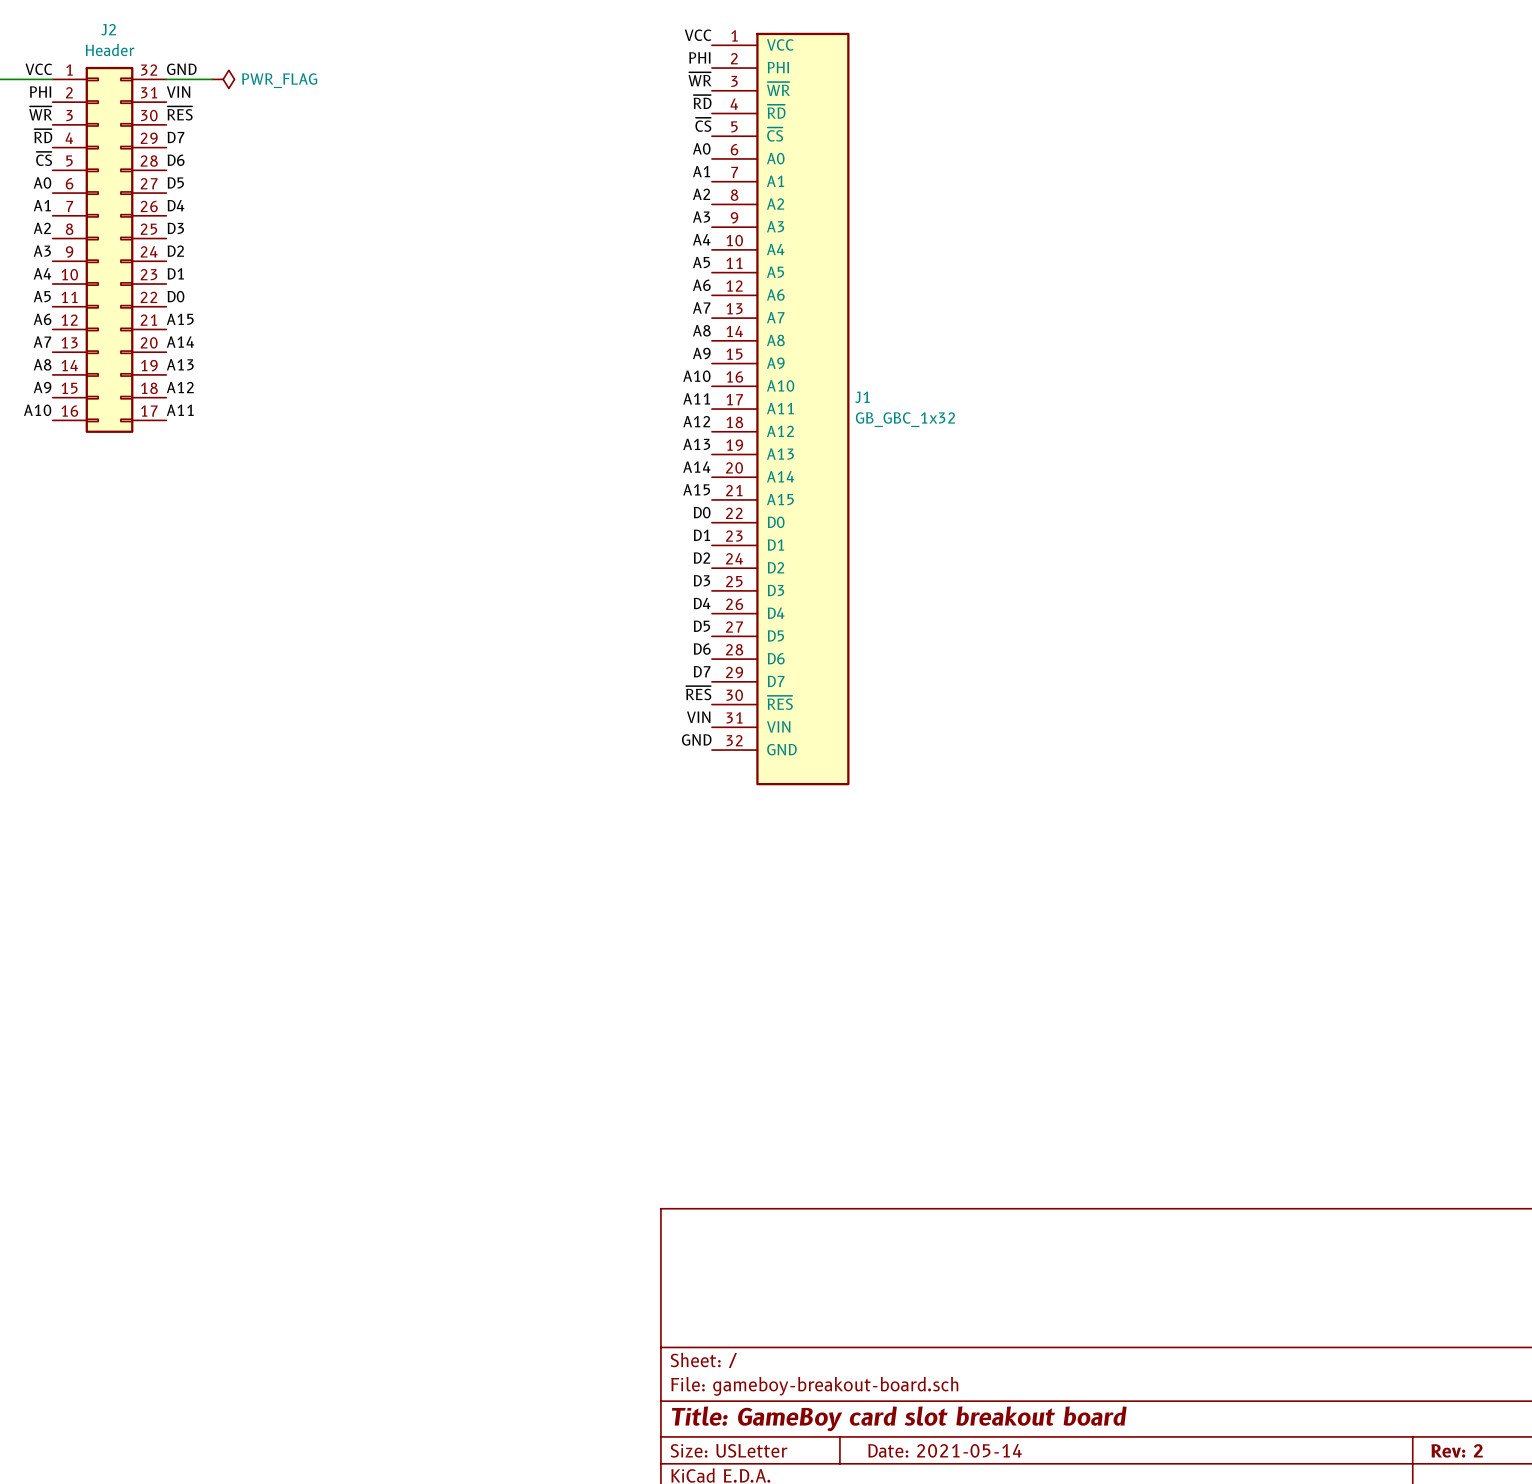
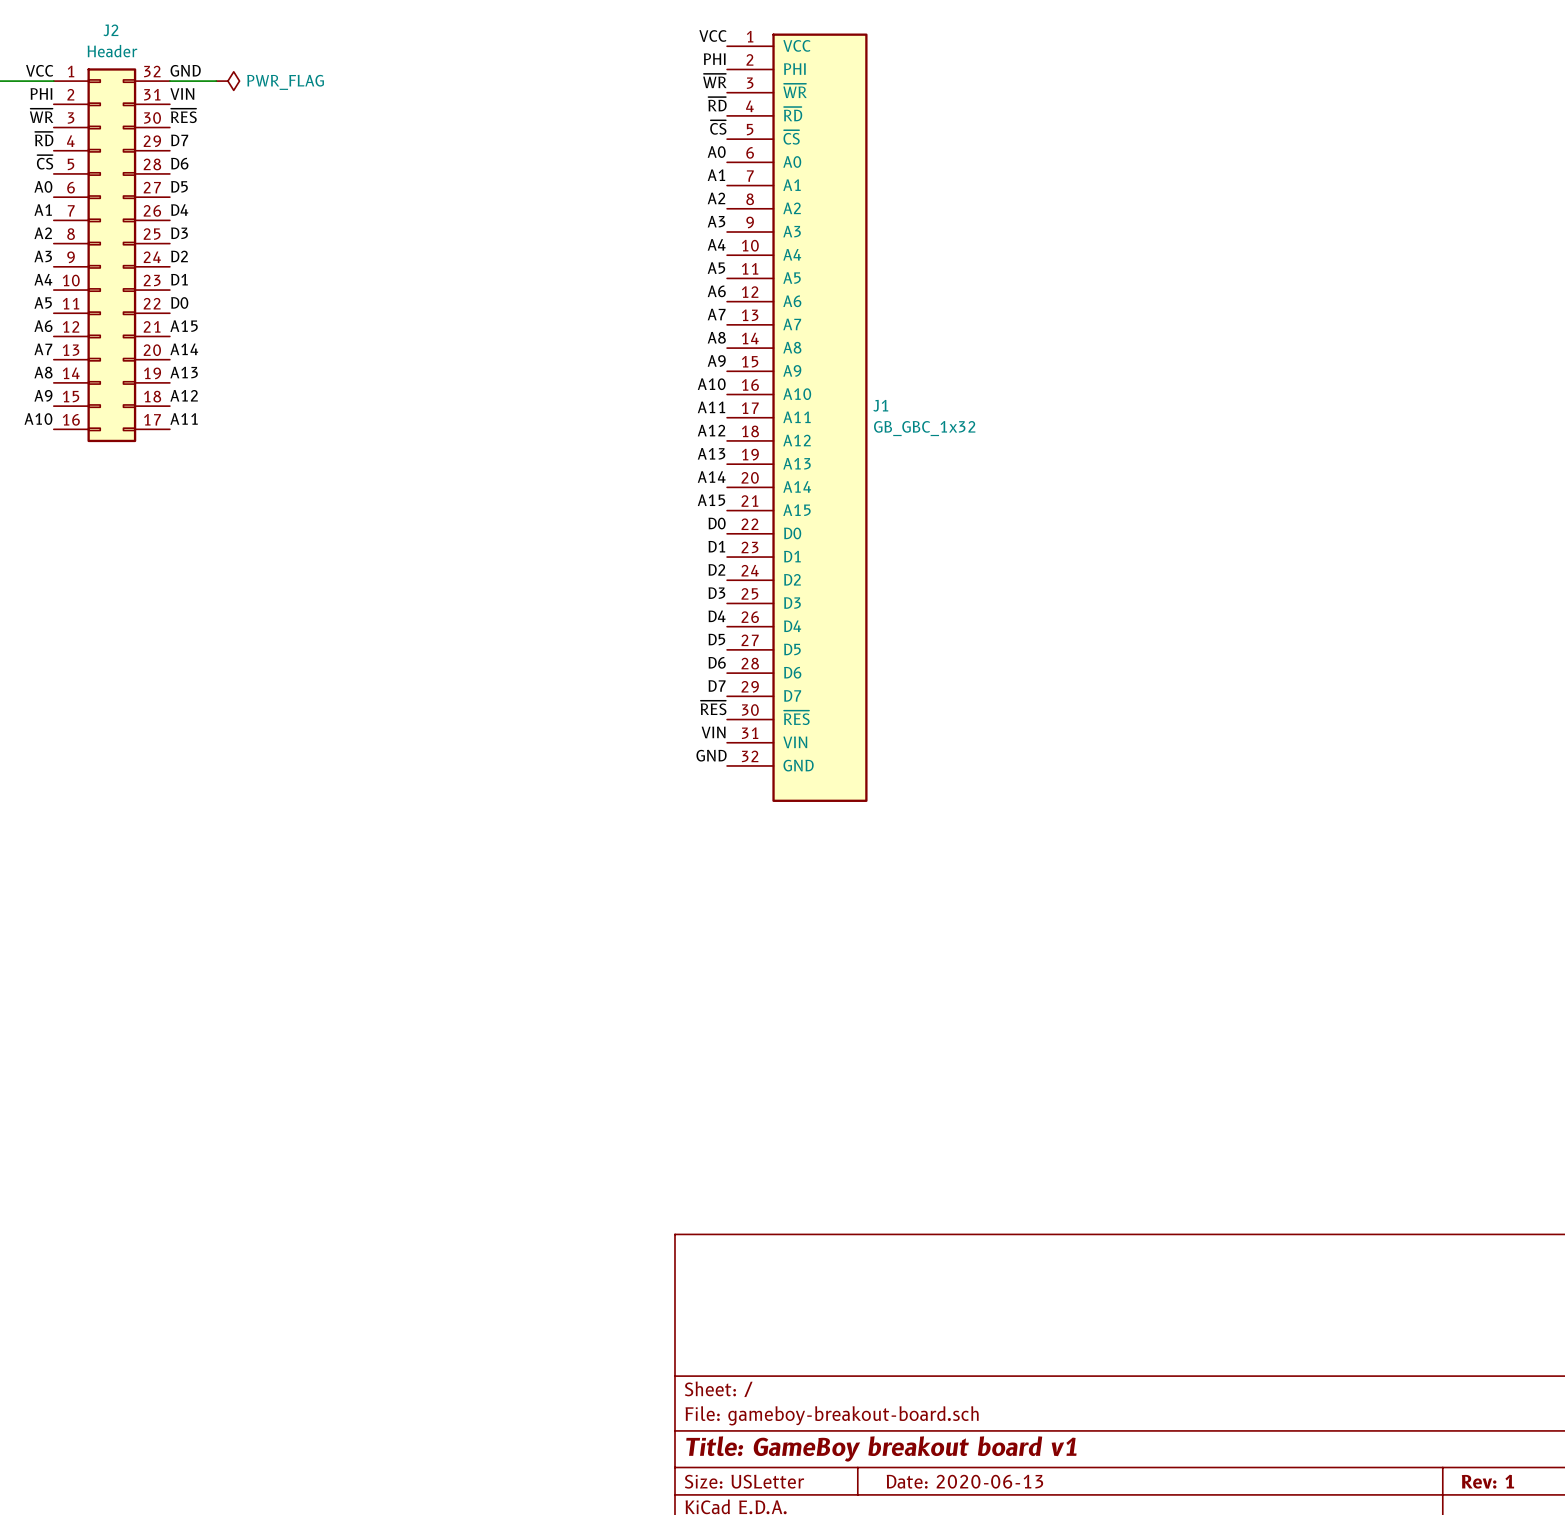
title block: Title: GameBoy card slot breakout board (899, 1418) -> Title: GameBoy breakout board v1 (881, 1448)
title block: Date: 2021-05-14 (945, 1450) -> Date: 2020-06-13 (964, 1481)
title block: Rev: 2 (1457, 1450) -> Rev: 1 (1487, 1481)

